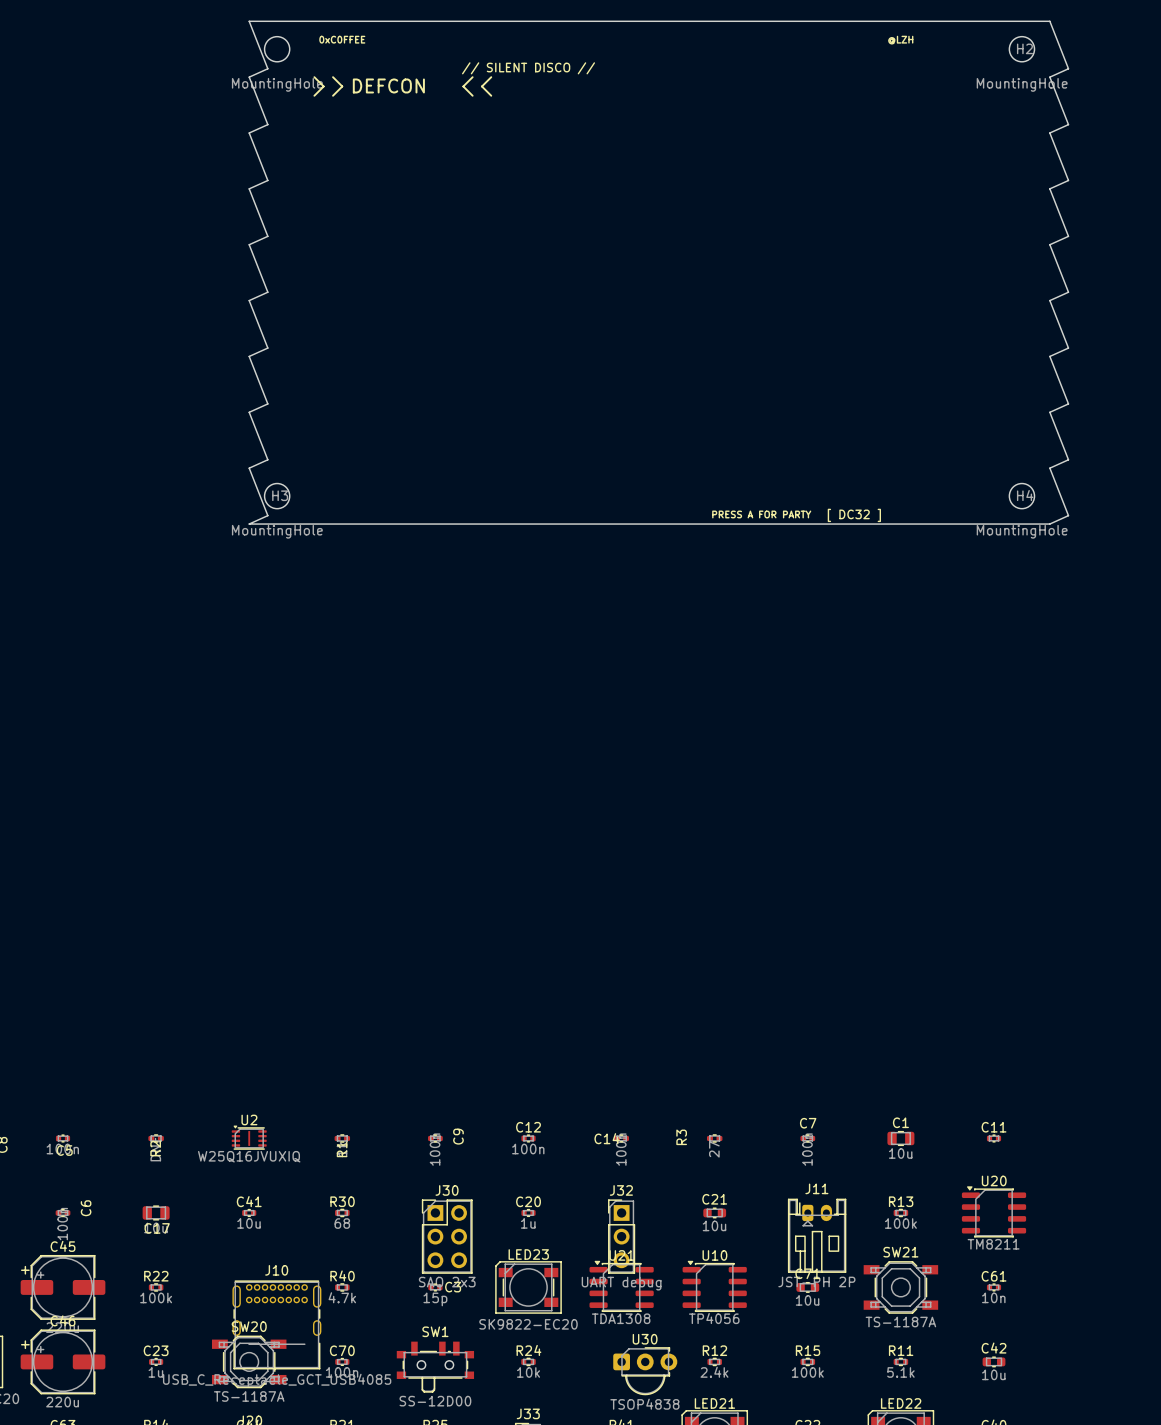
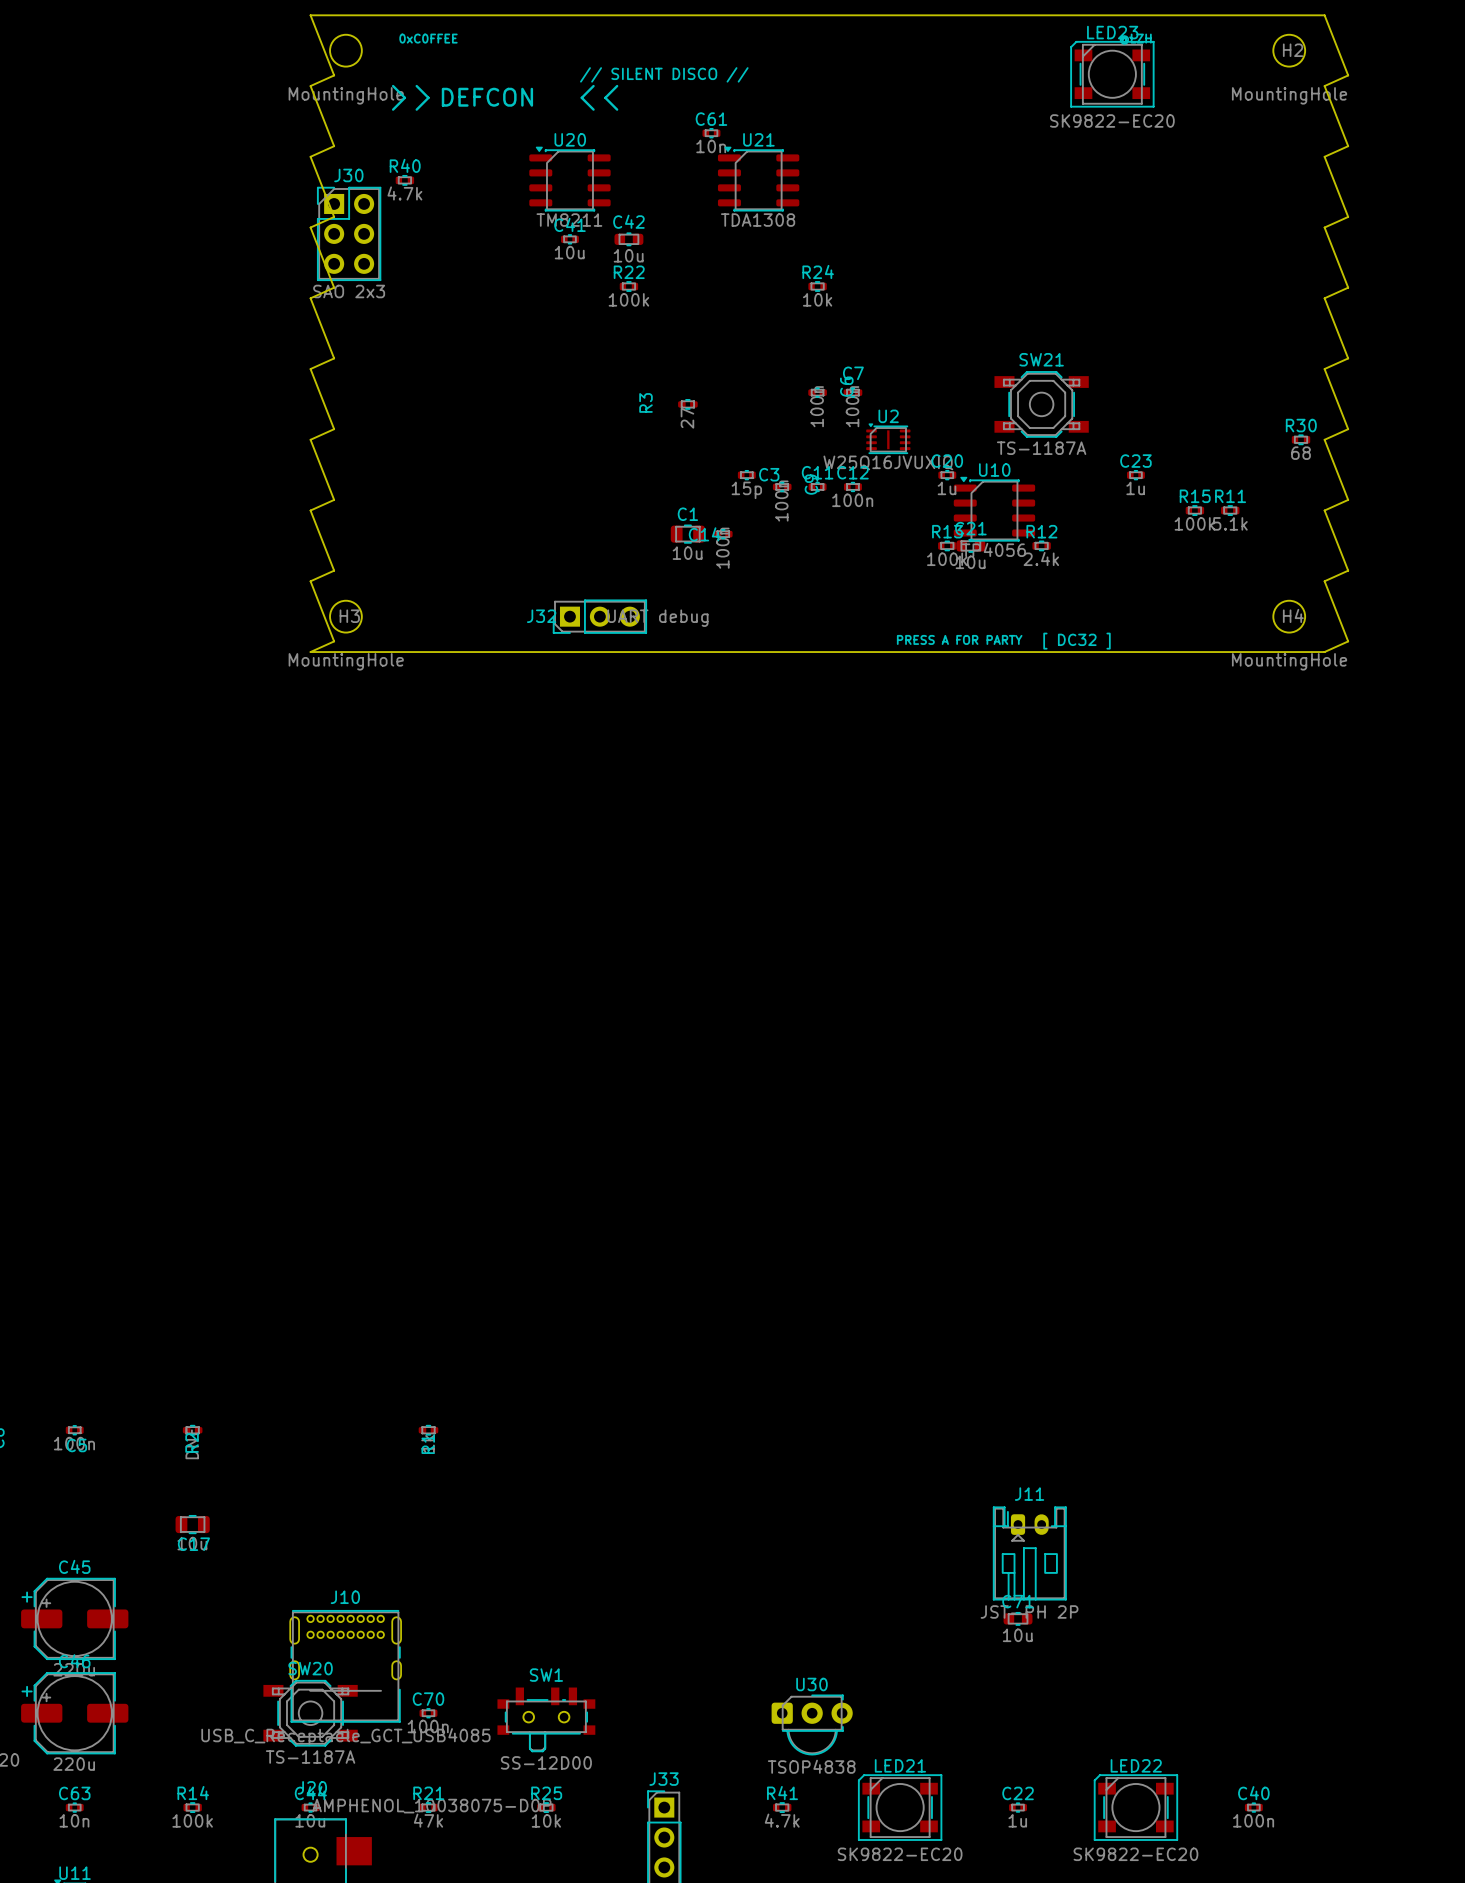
U2 position: (249, 1137) -> (888, 438)
C9 position: (435, 1138) -> (782, 486)
C12 position: (528, 1138) -> (852, 486)
C14 position: (621, 1138) -> (723, 534)
R3 position: (714, 1138) -> (687, 404)
C7 position: (807, 1138) -> (852, 392)
C1 position: (900, 1138) -> (687, 534)
C11 position: (994, 1138) -> (817, 486)
U20 position: (994, 1211) -> (569, 178)
C6 position: (63, 1212) -> (817, 392)
C41 position: (249, 1212) -> (569, 239)
R30 position: (342, 1212) -> (1301, 439)
C20 position: (528, 1212) -> (947, 475)
C21 position: (714, 1212) -> (970, 545)
R13 position: (900, 1212) -> (947, 545)
J30 position: (447, 1236) -> (349, 233)
J32 rotation: 0° (621, 1236) -> 90° counterclockwise (599, 616)
J32 position: (621, 1236) -> (599, 616)
U21 position: (621, 1286) -> (758, 178)
U10 position: (714, 1286) -> (994, 509)
R22 position: (156, 1287) -> (628, 286)
R40 position: (342, 1287) -> (404, 180)
C3 position: (435, 1287) -> (746, 475)
LED23 position: (528, 1287) -> (1112, 74)
SW21 position: (900, 1287) -> (1041, 404)
C61 position: (994, 1287) -> (711, 133)
C23 position: (156, 1361) -> (1135, 475)
R24 position: (528, 1361) -> (817, 286)
R12 position: (714, 1361) -> (1041, 545)
R15 position: (807, 1361) -> (1194, 510)
R11 position: (900, 1361) -> (1230, 510)
C42 position: (994, 1361) -> (628, 239)

